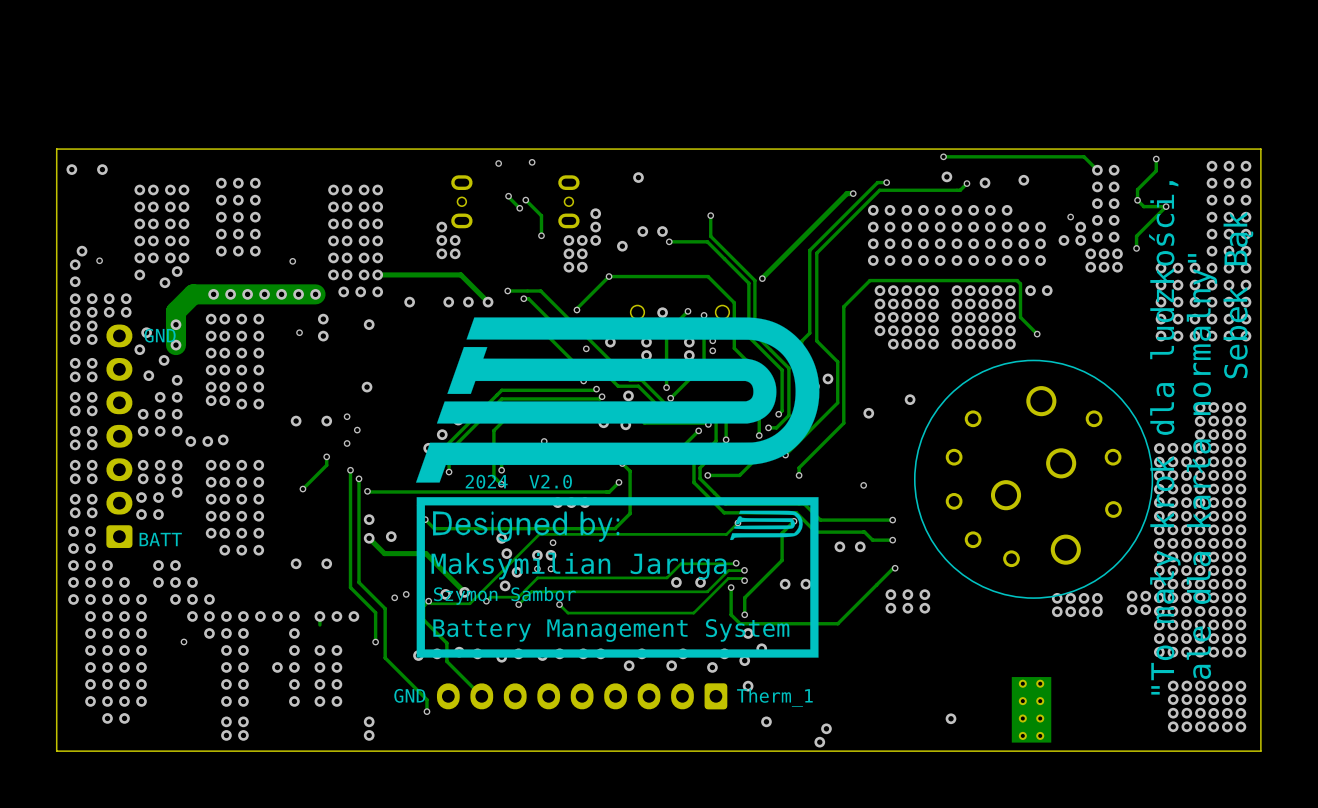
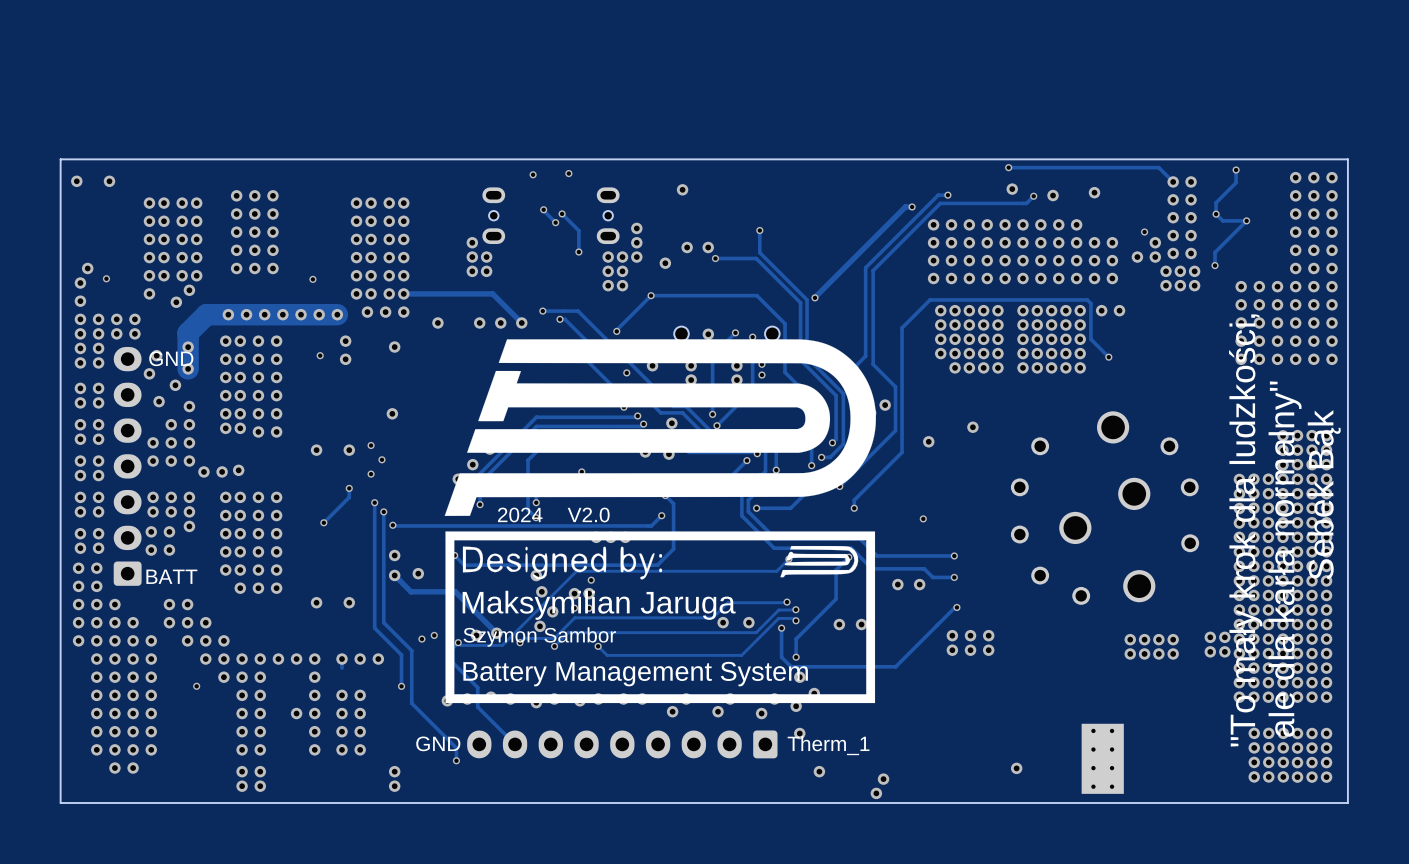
part footprint: [913, 359, 1154, 599] -> [1010, 411, 1200, 605]

